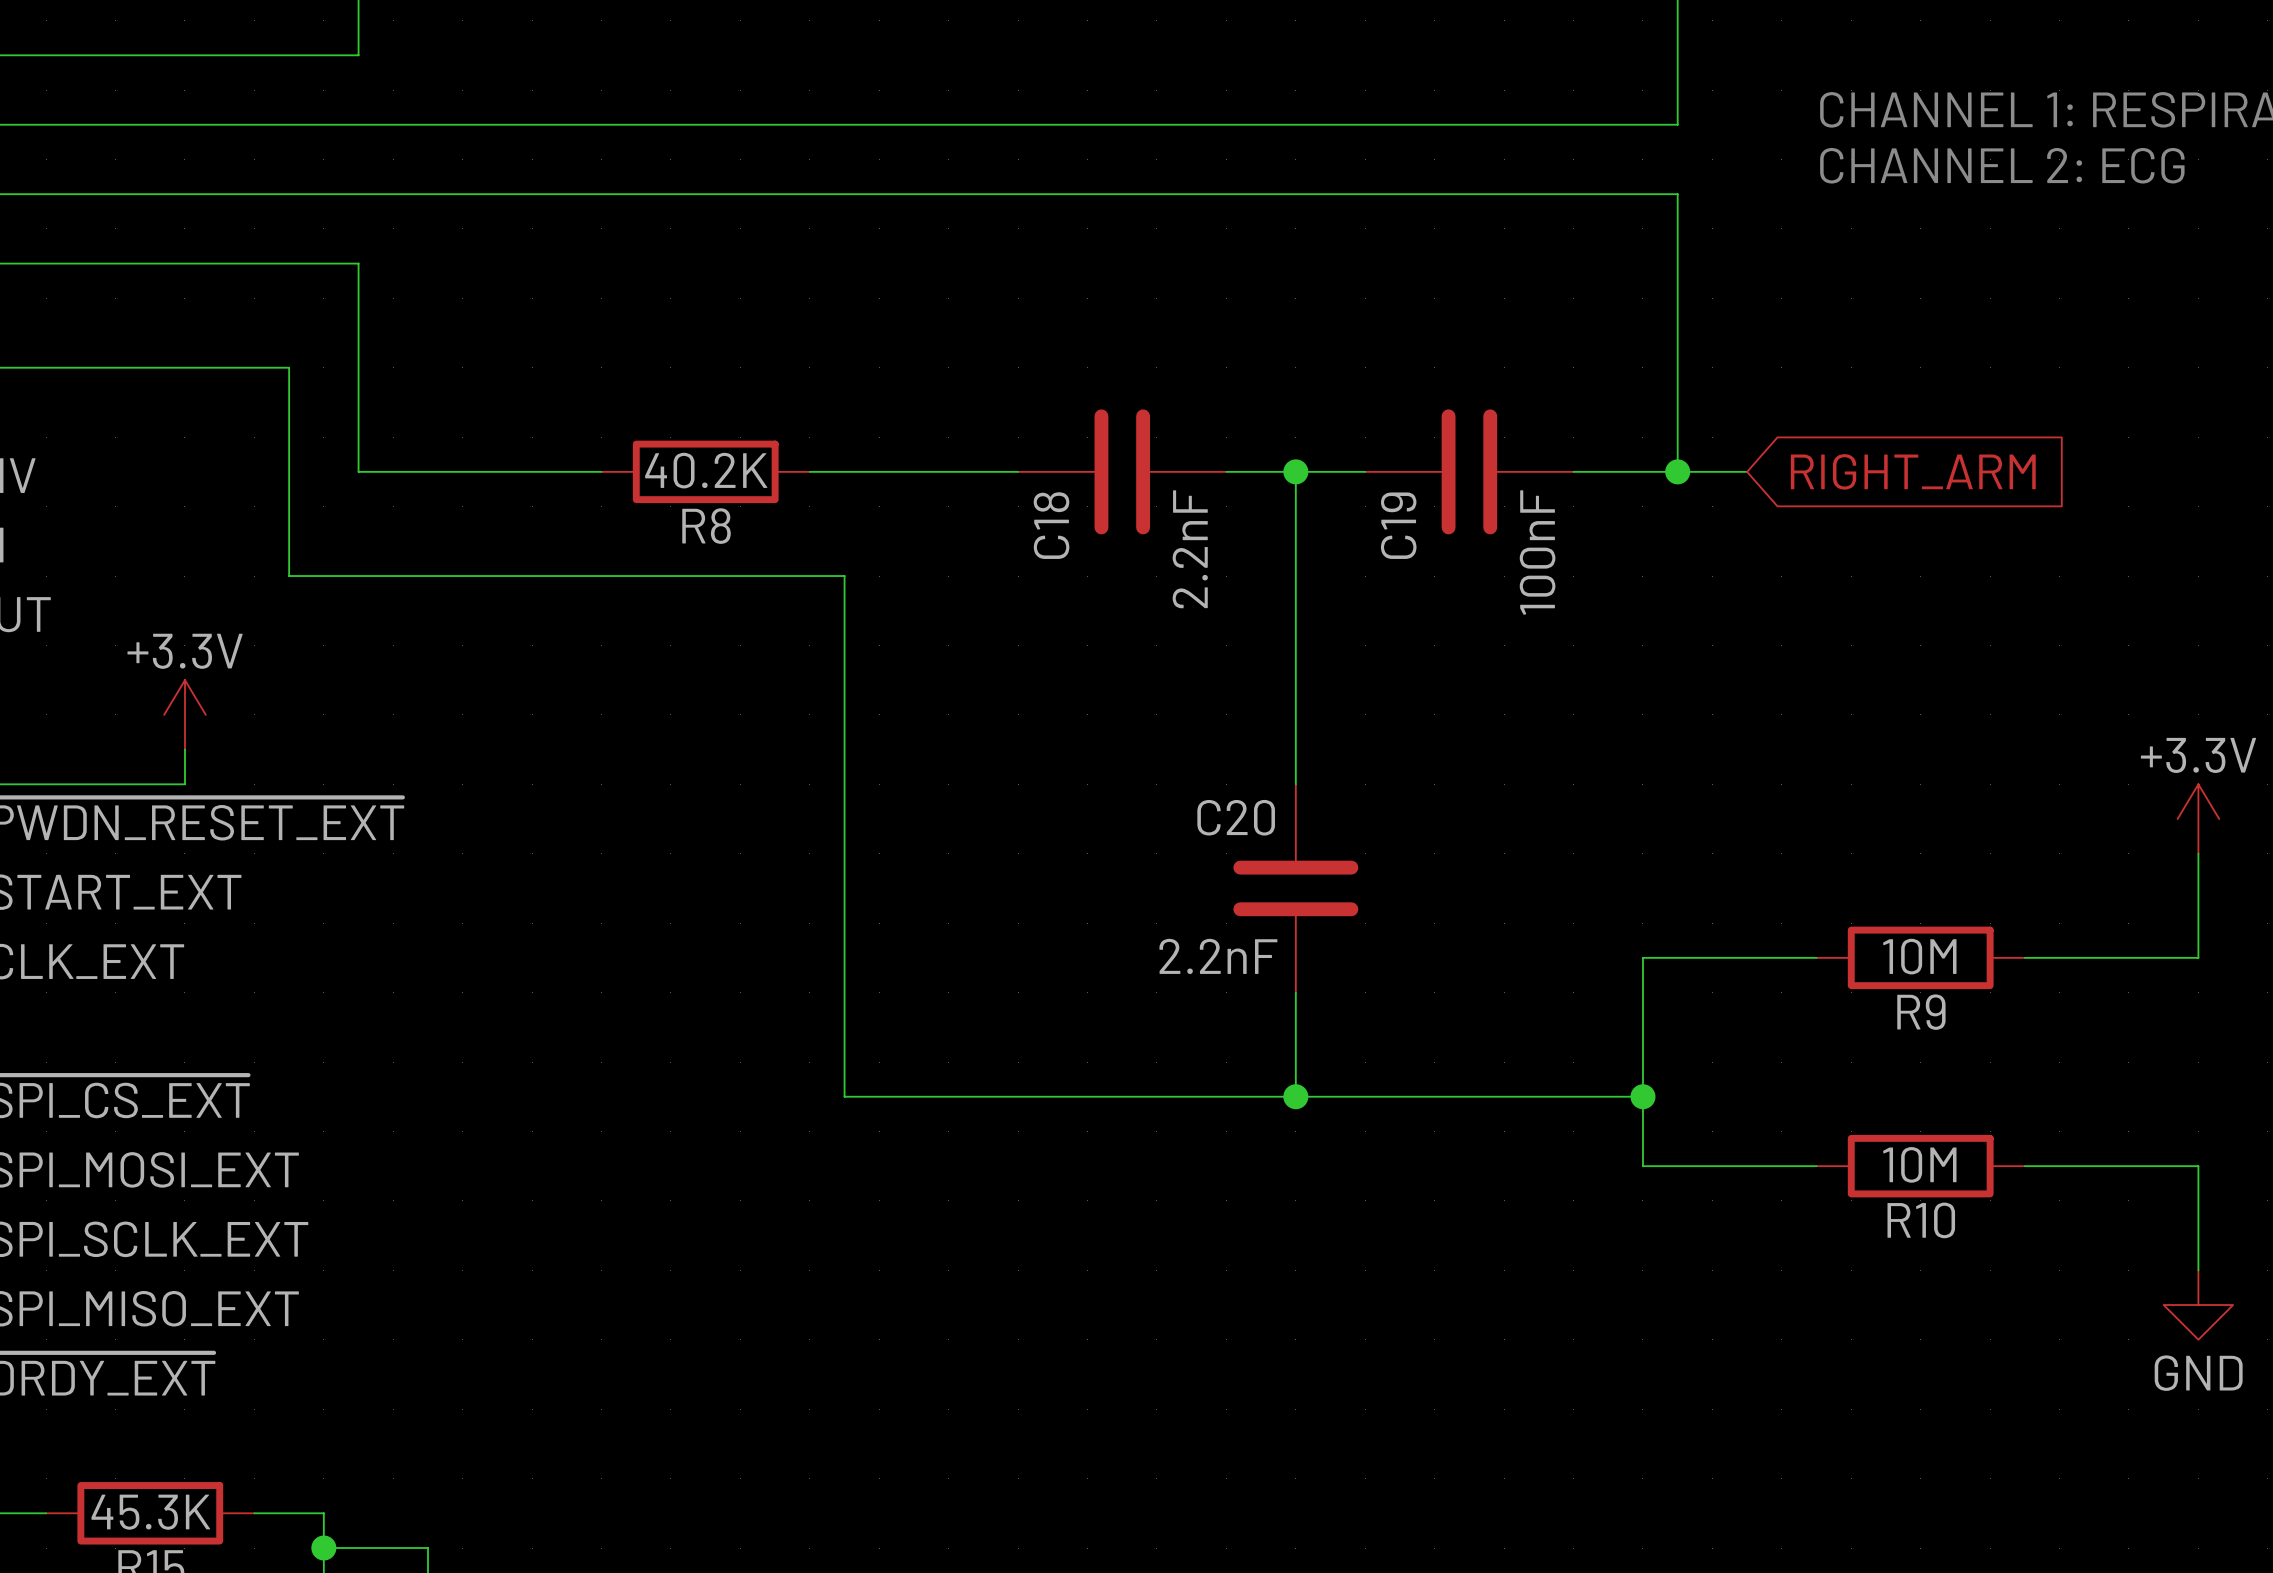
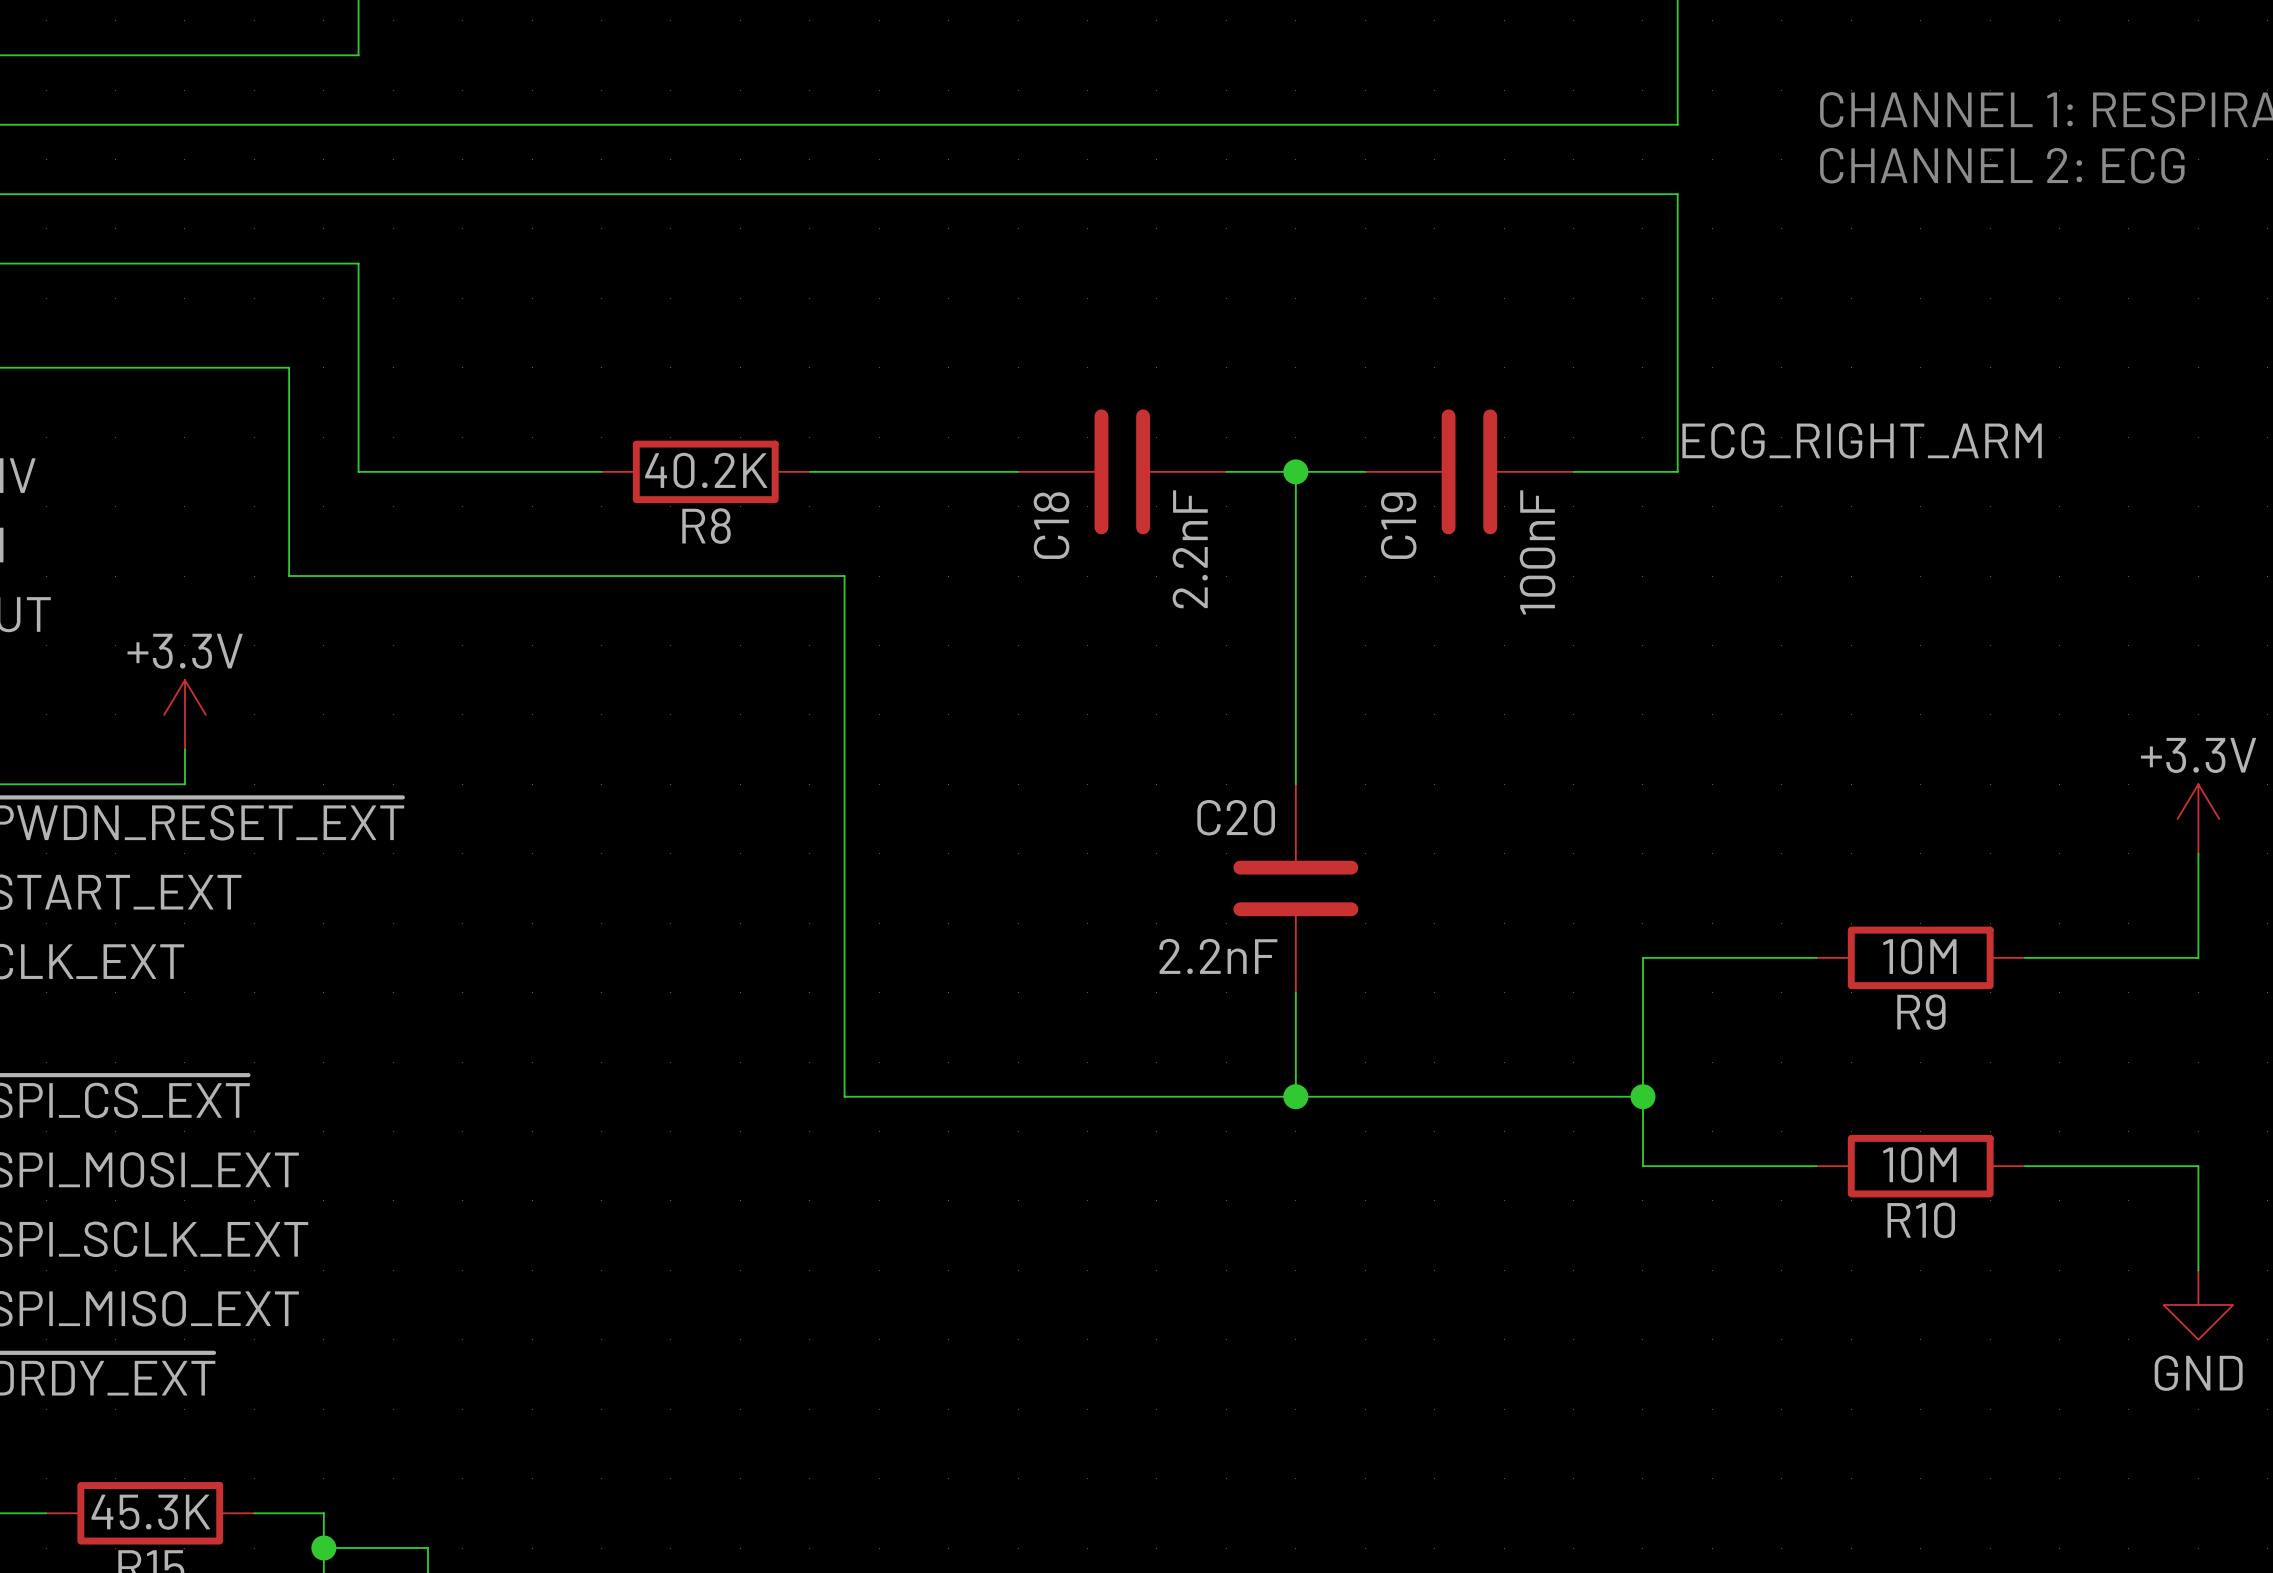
label: none -> ECG_RIGHT_ARM (1862, 440)
wire: (1677, 471) (1747, 471) -> none
junction: (1677, 471) -> none
global label: RIGHT_ARM (1913, 471) -> none

